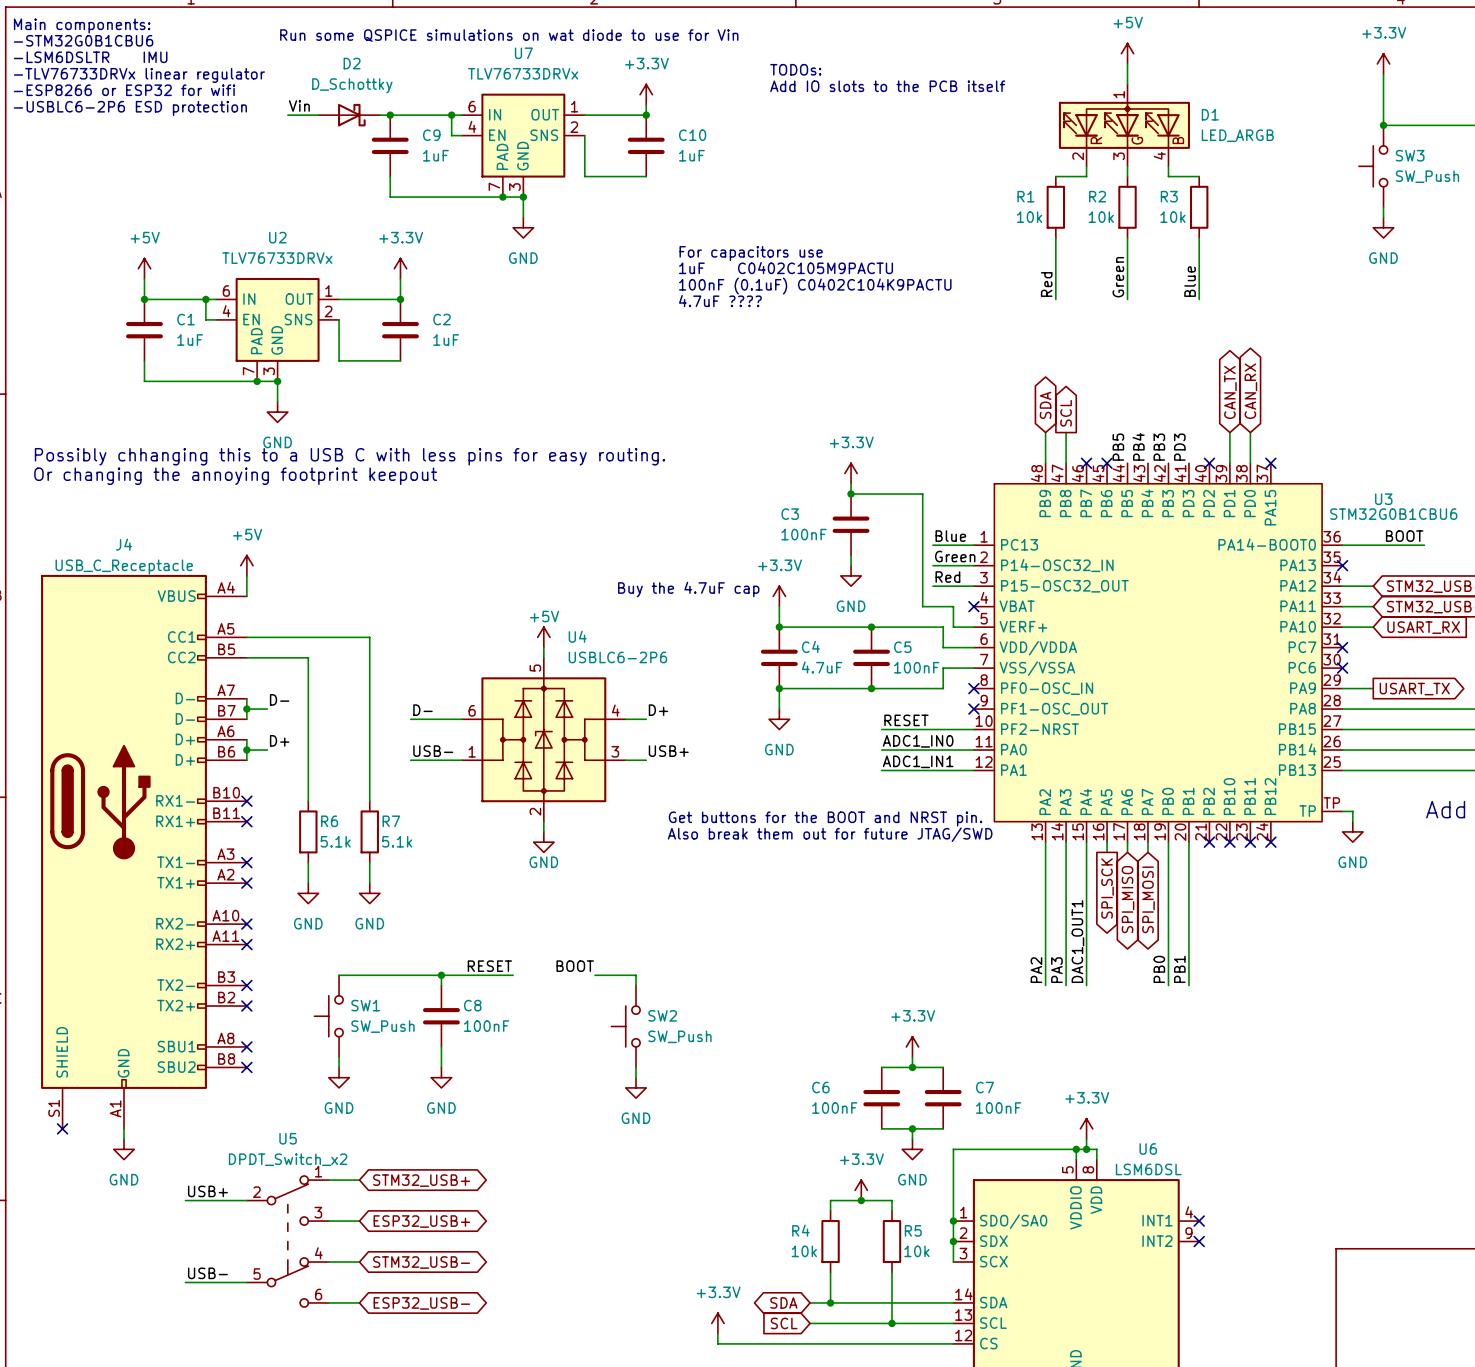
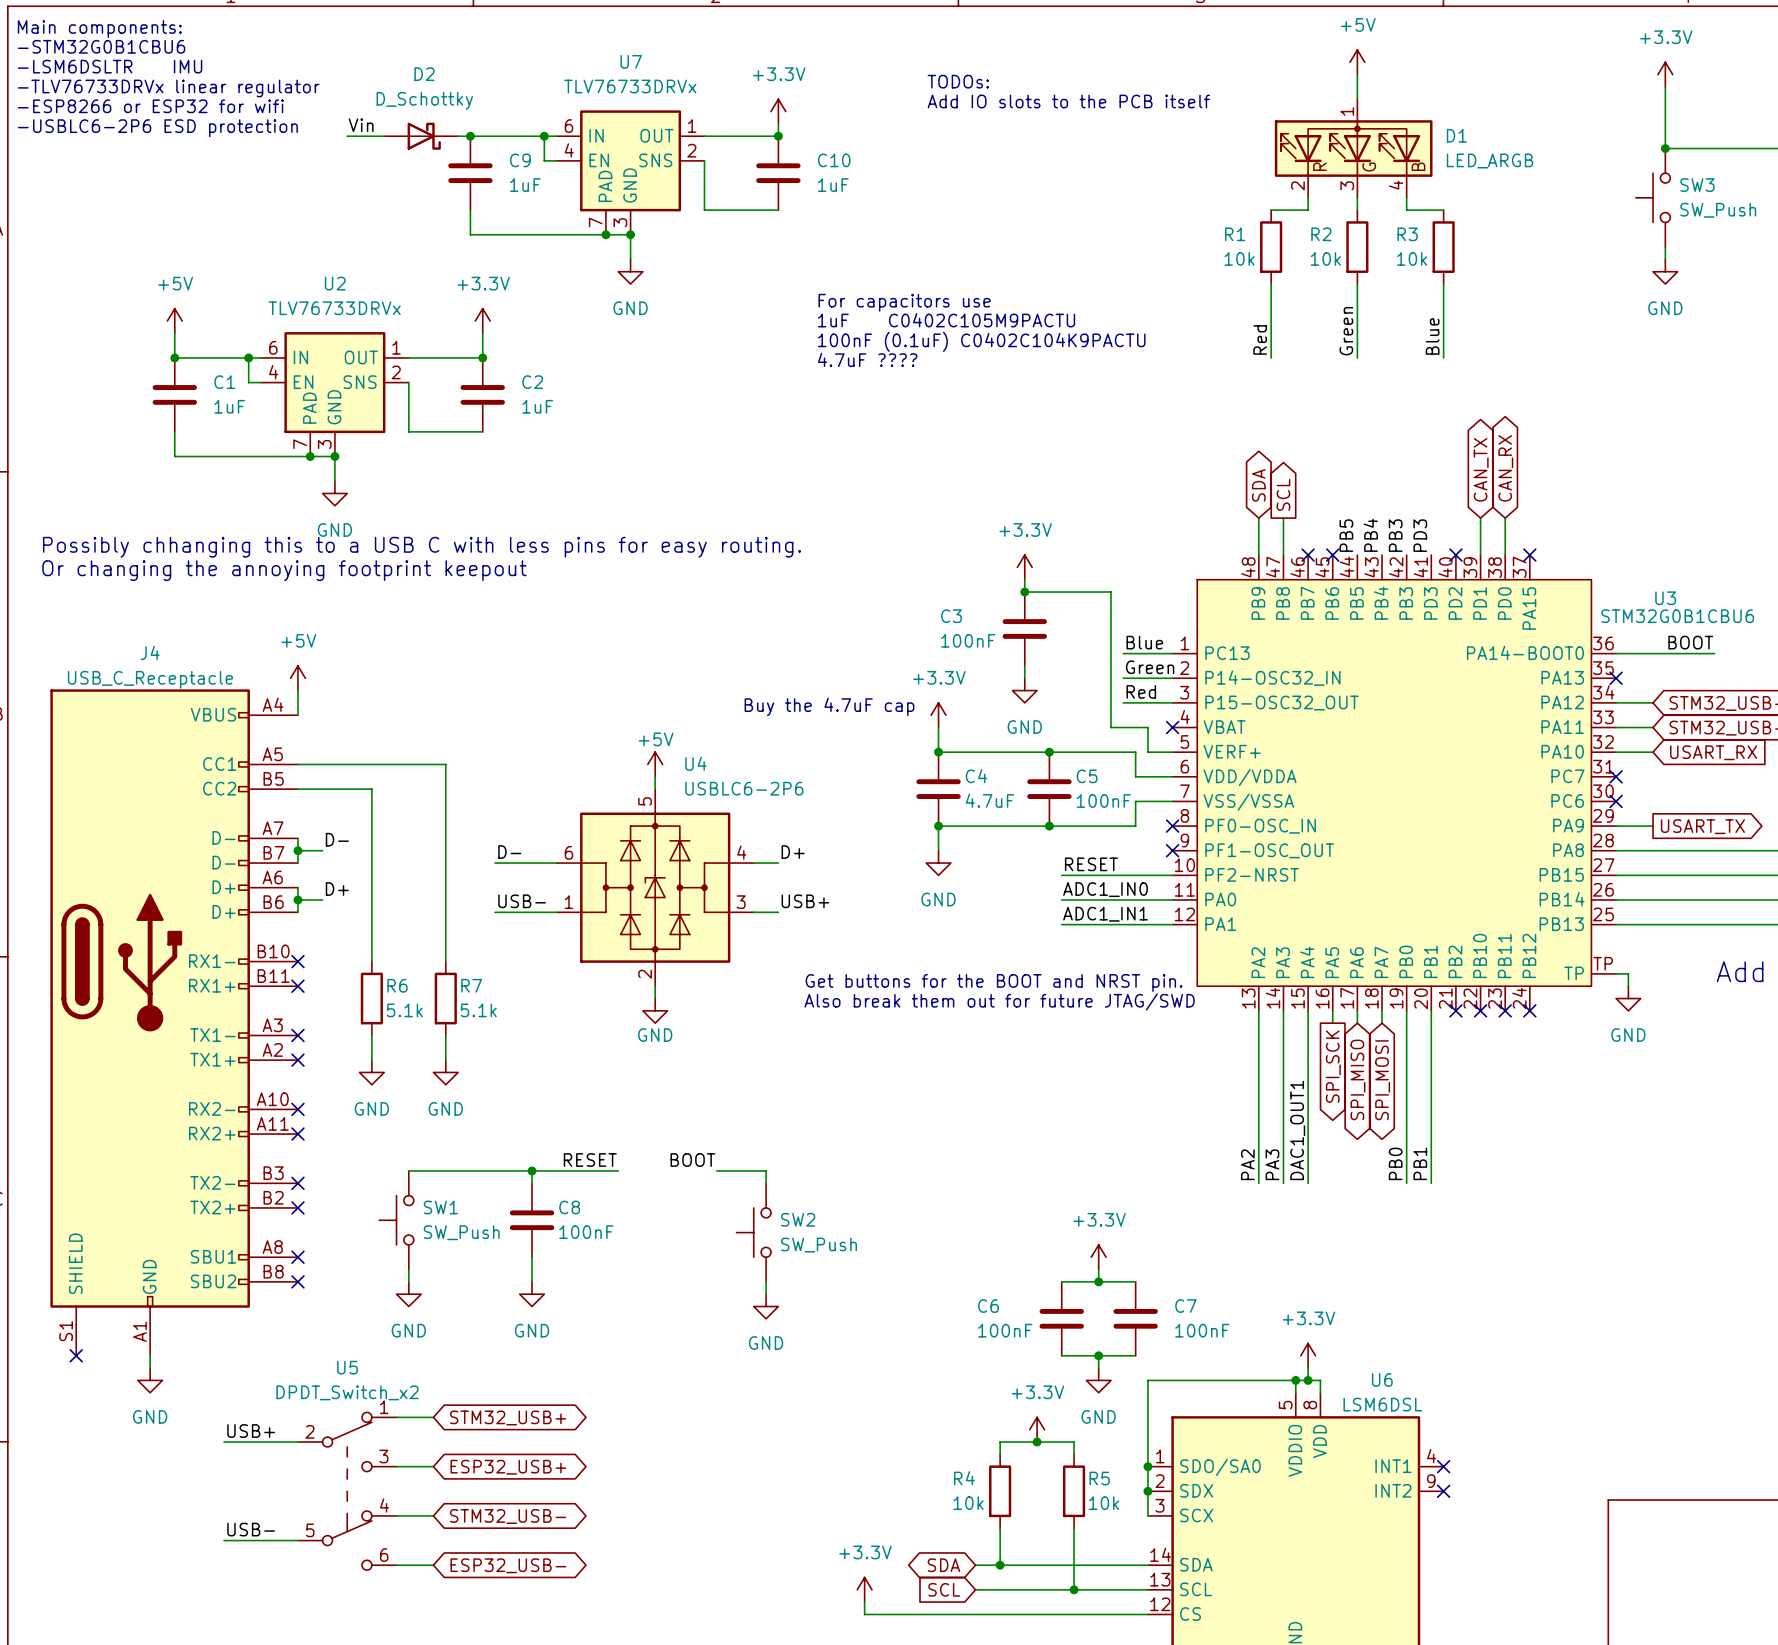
text: Run some QSPICE simulations on wat diode to use for Vin (509, 35) -> none

